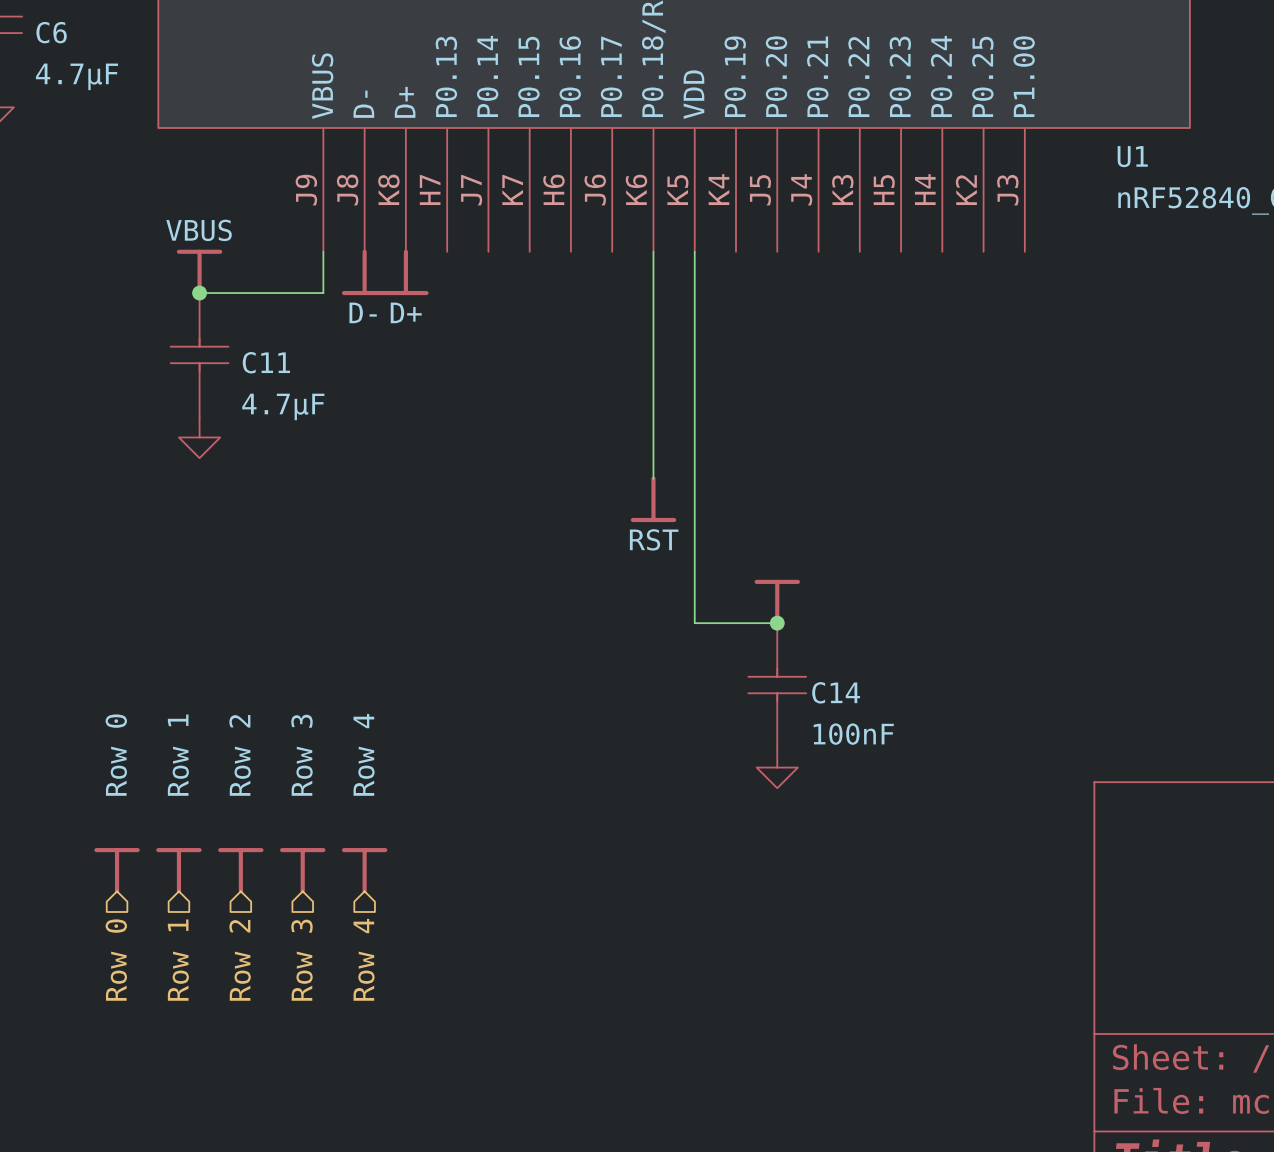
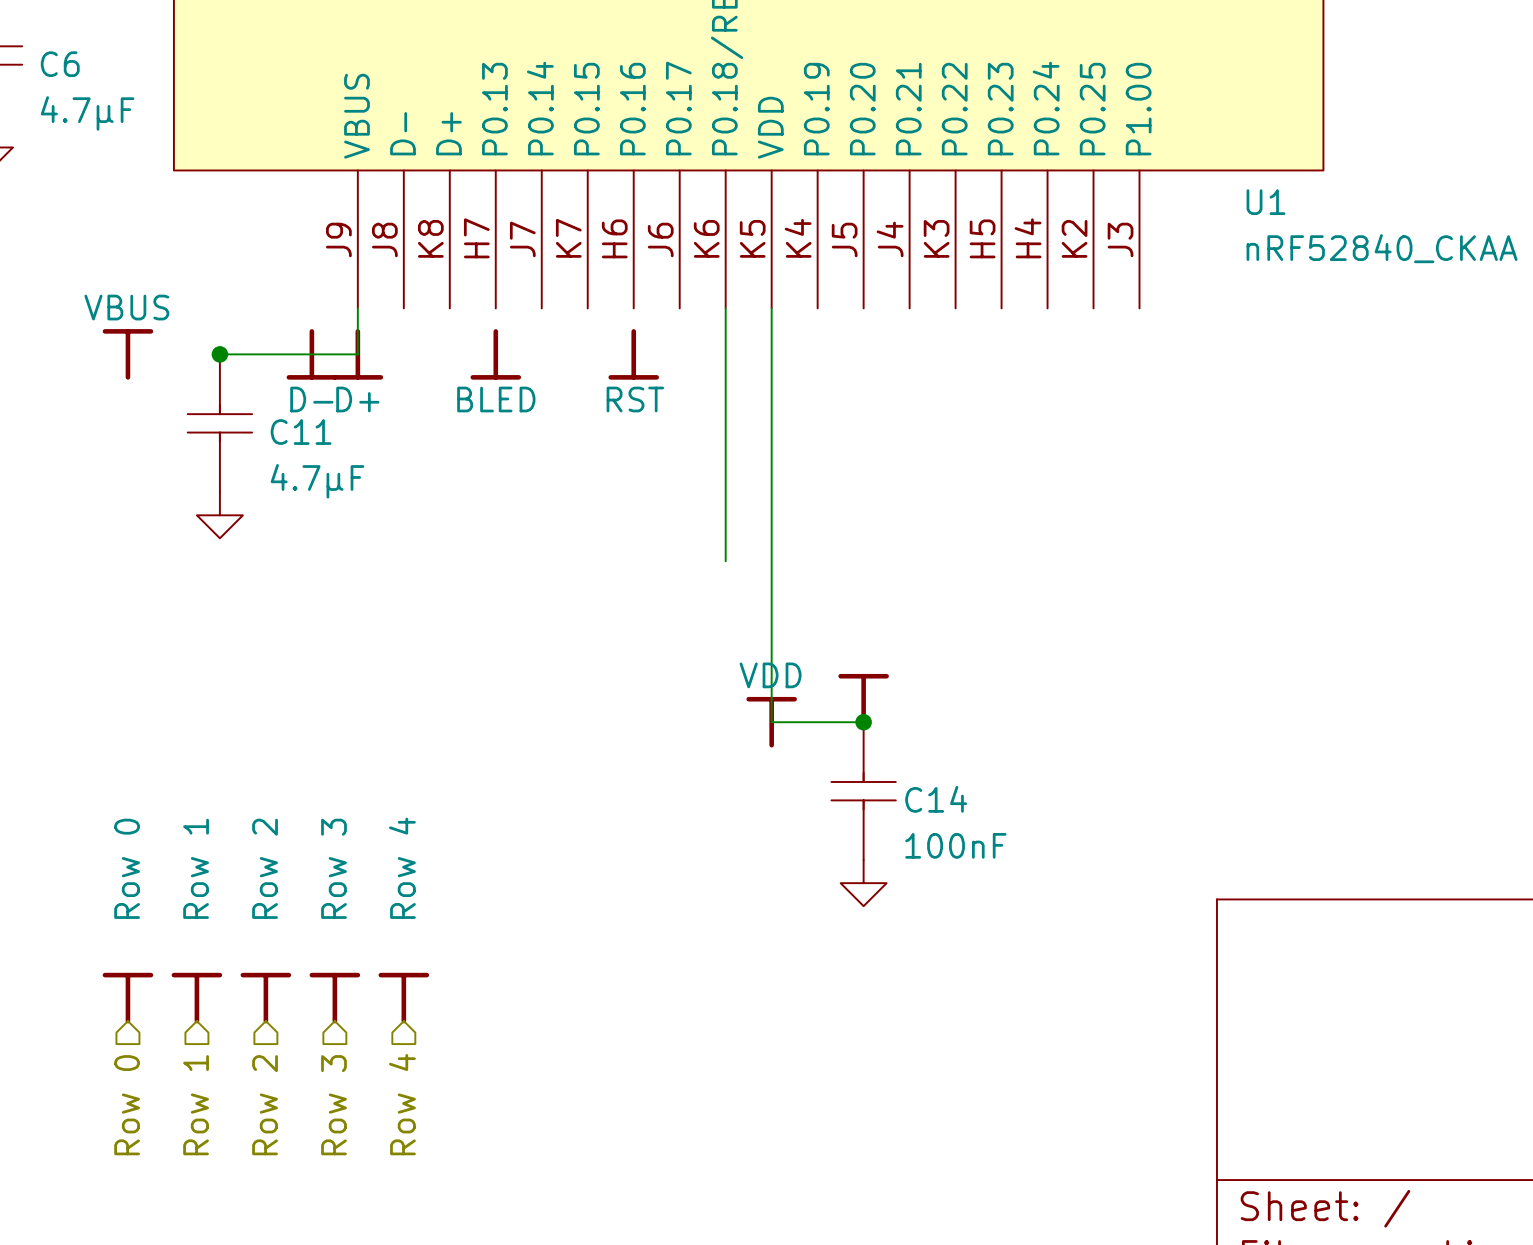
power symbol position: VBUS (199, 272) -> VBUS (127, 354)
power symbol position: D- (364, 272) -> D- (311, 354)
power symbol position: D+ (405, 272) -> D+ (357, 354)
power symbol: none -> BLED (495, 354)
power symbol position: RST (653, 499) -> RST (633, 354)
power symbol: none -> VDD (771, 722)

